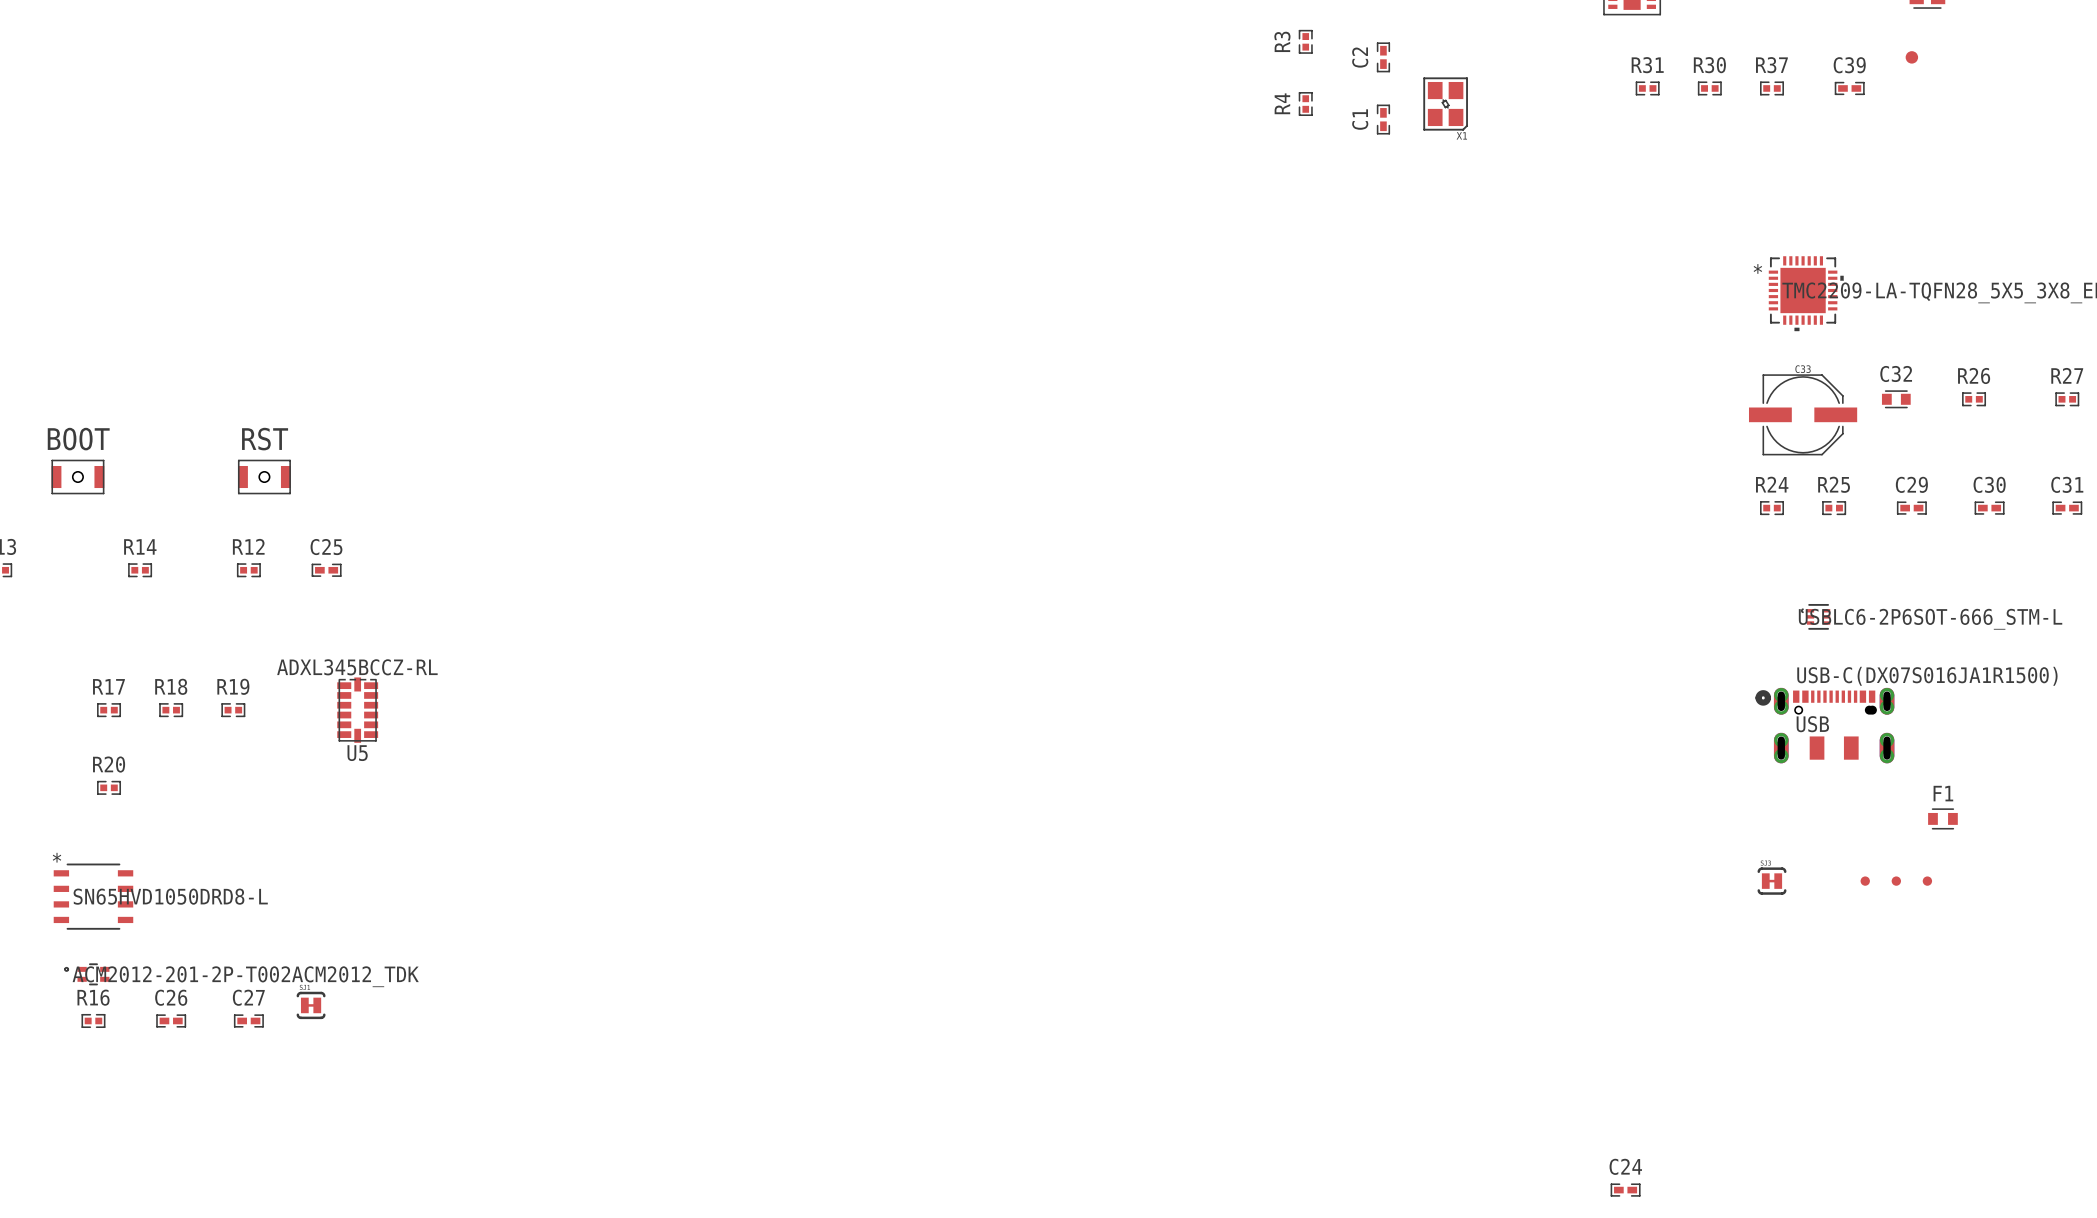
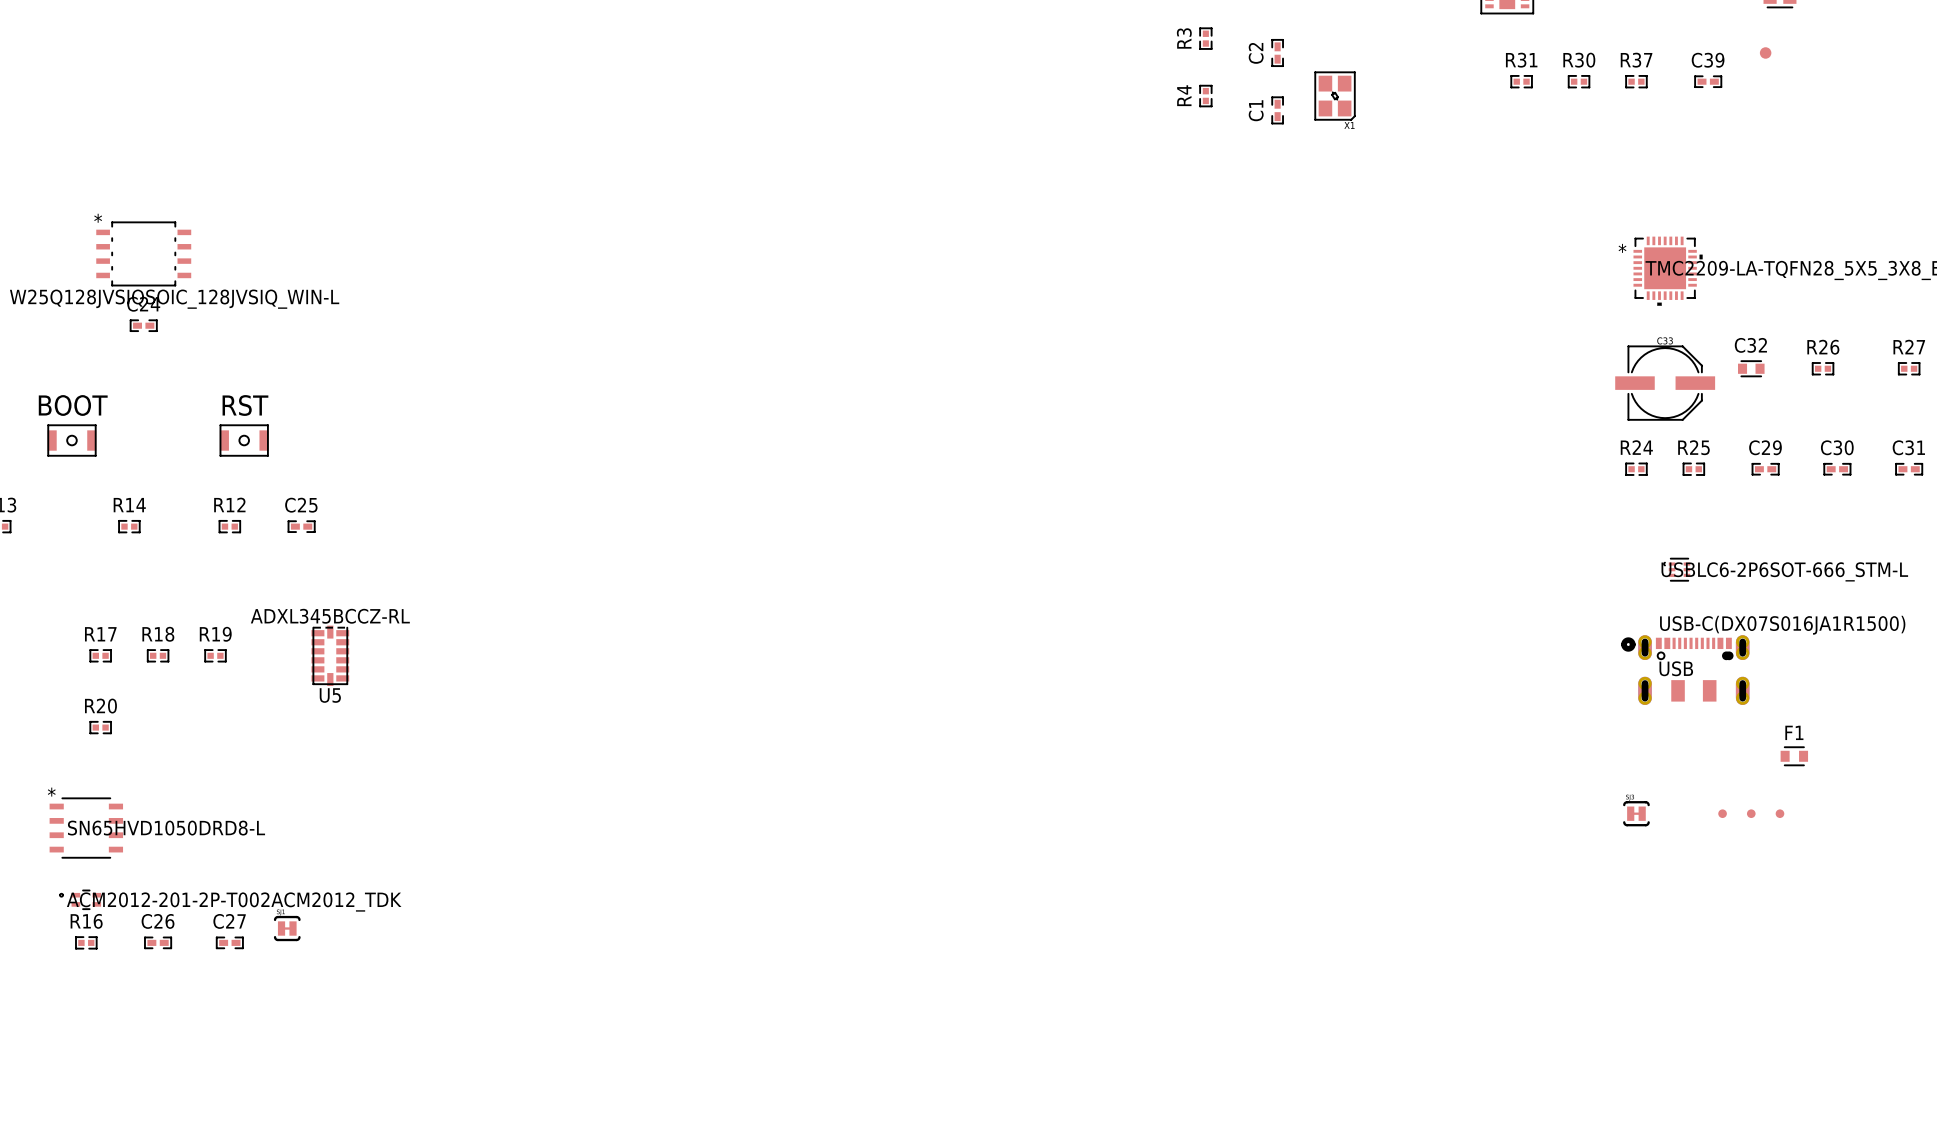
part: none -> W25Q128JVSIQSOIC_128JVSIQ_WIN-L (143, 253)
C24 position: (1625, 1190) -> (143, 325)

